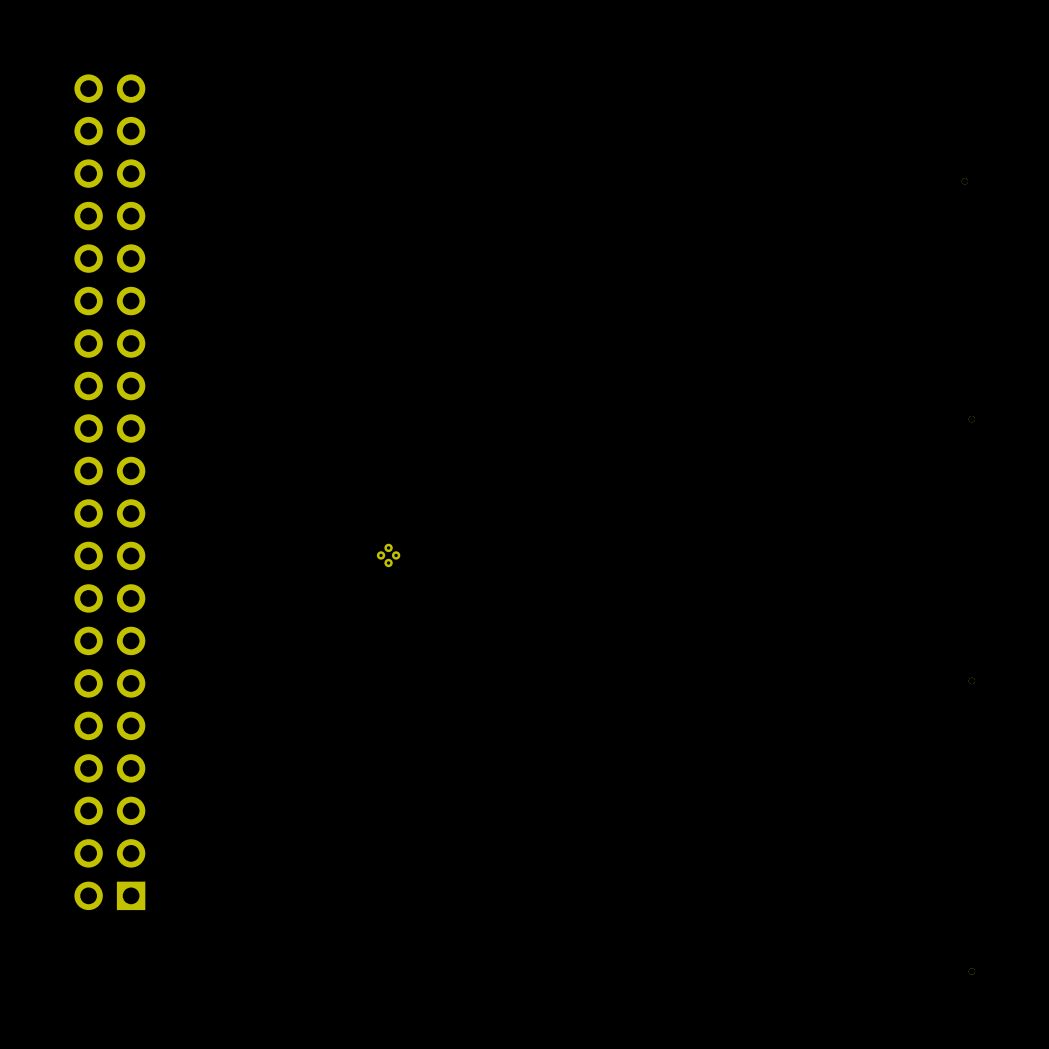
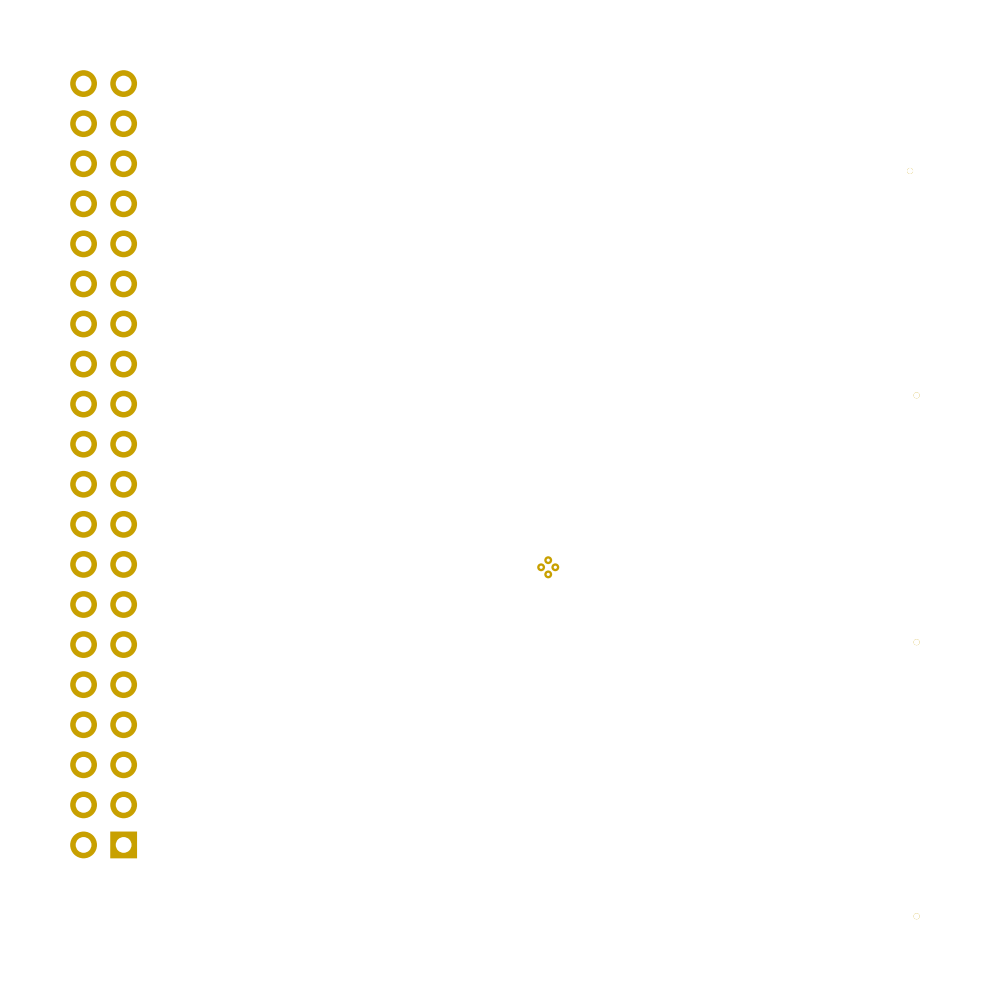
part position: (388, 555) -> (548, 567)

